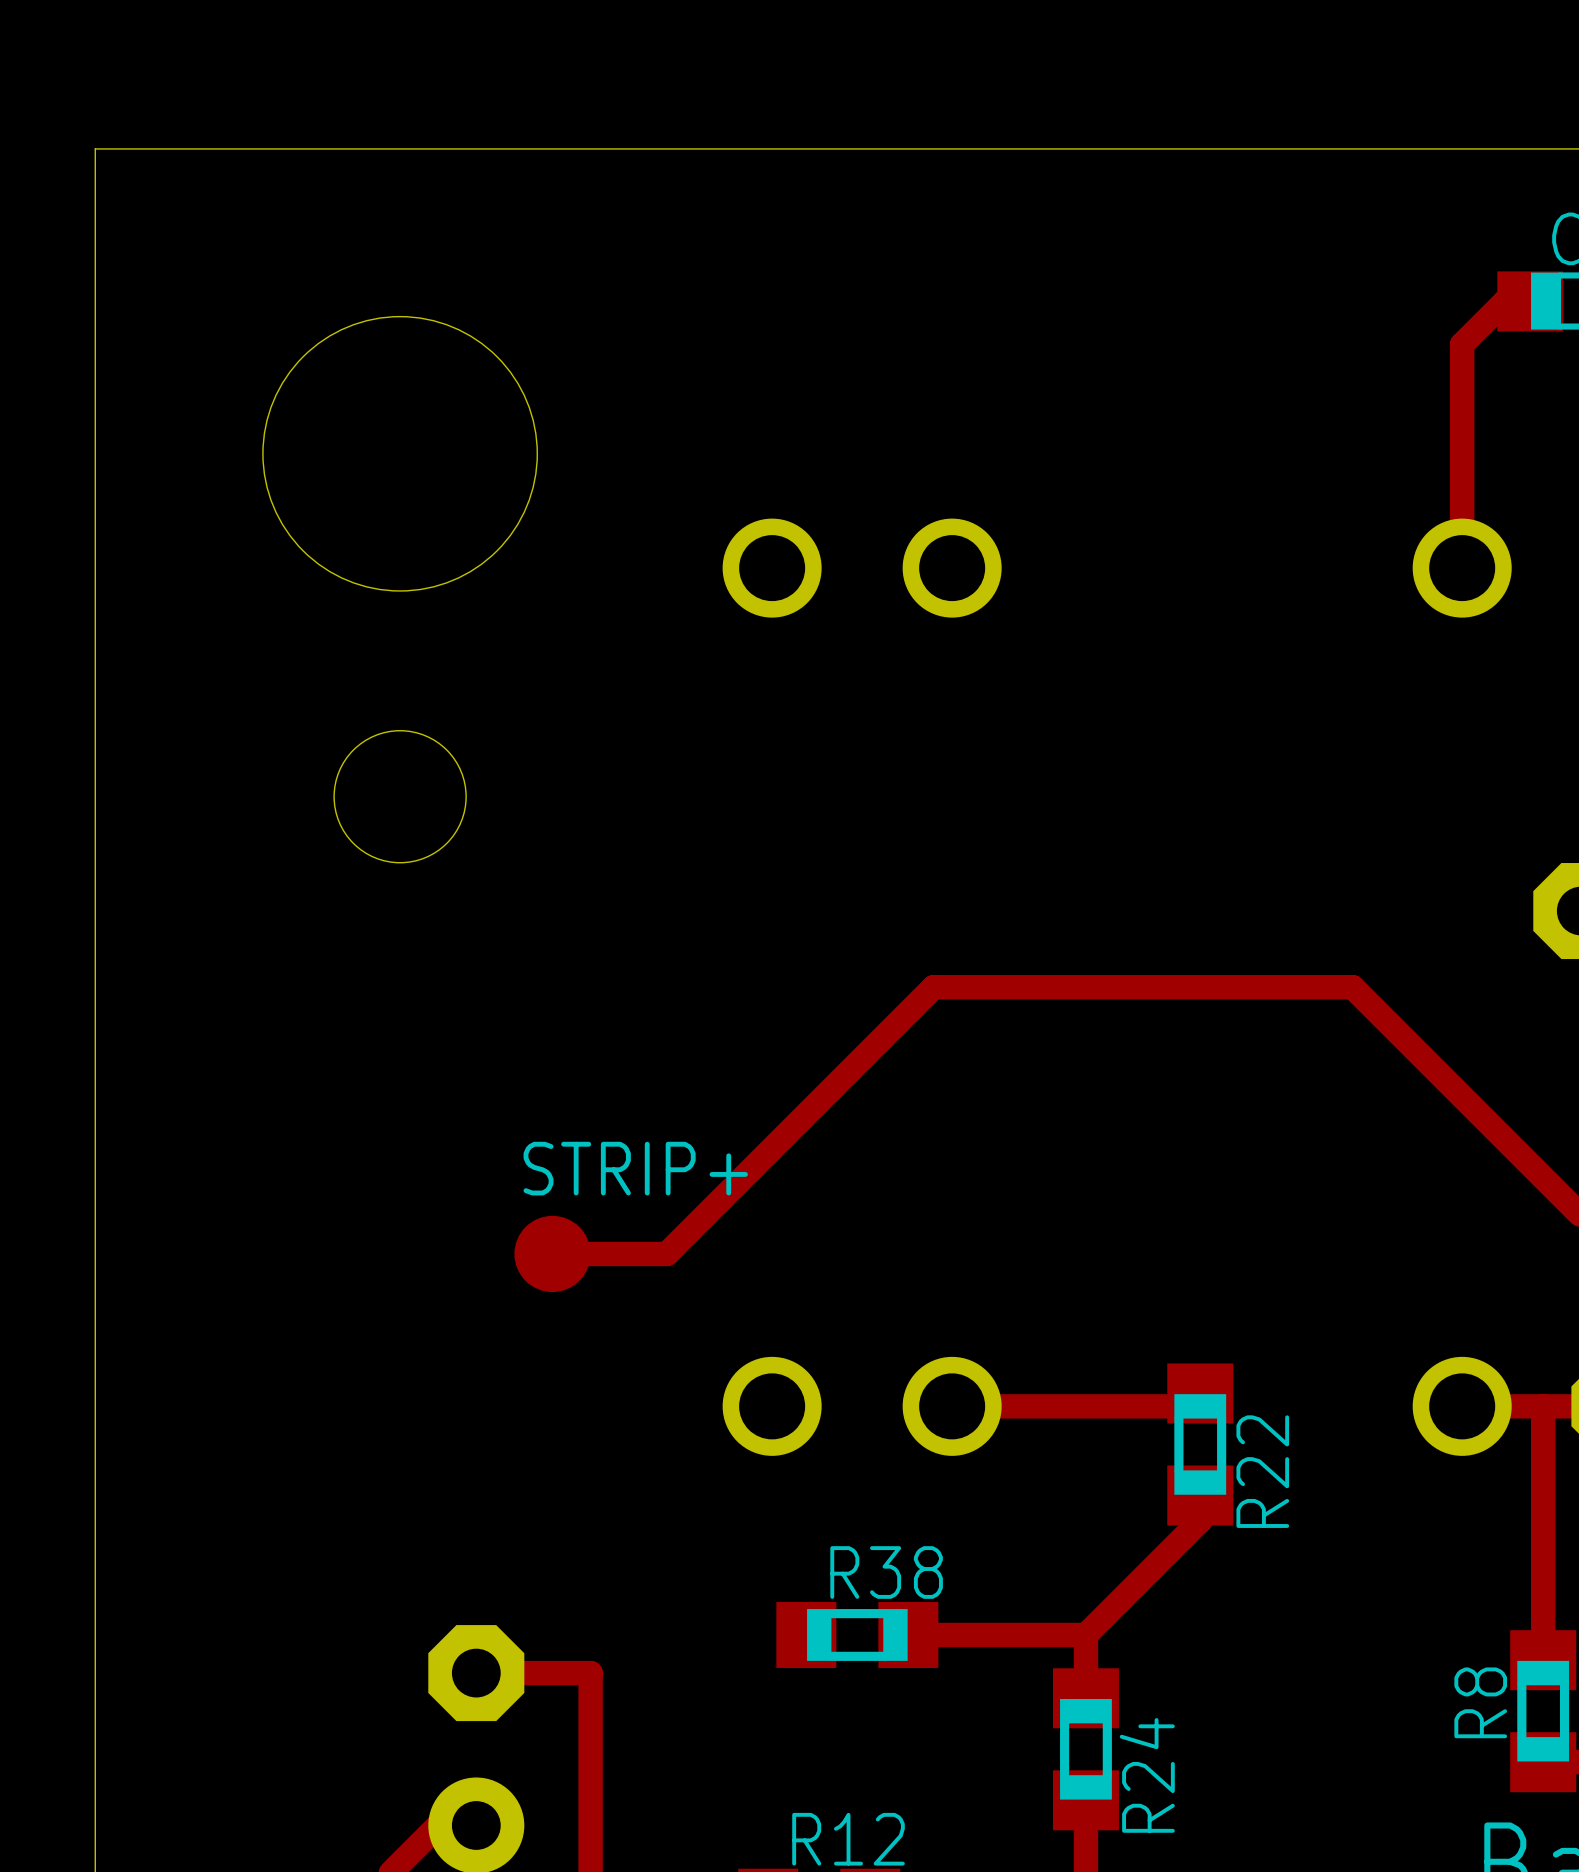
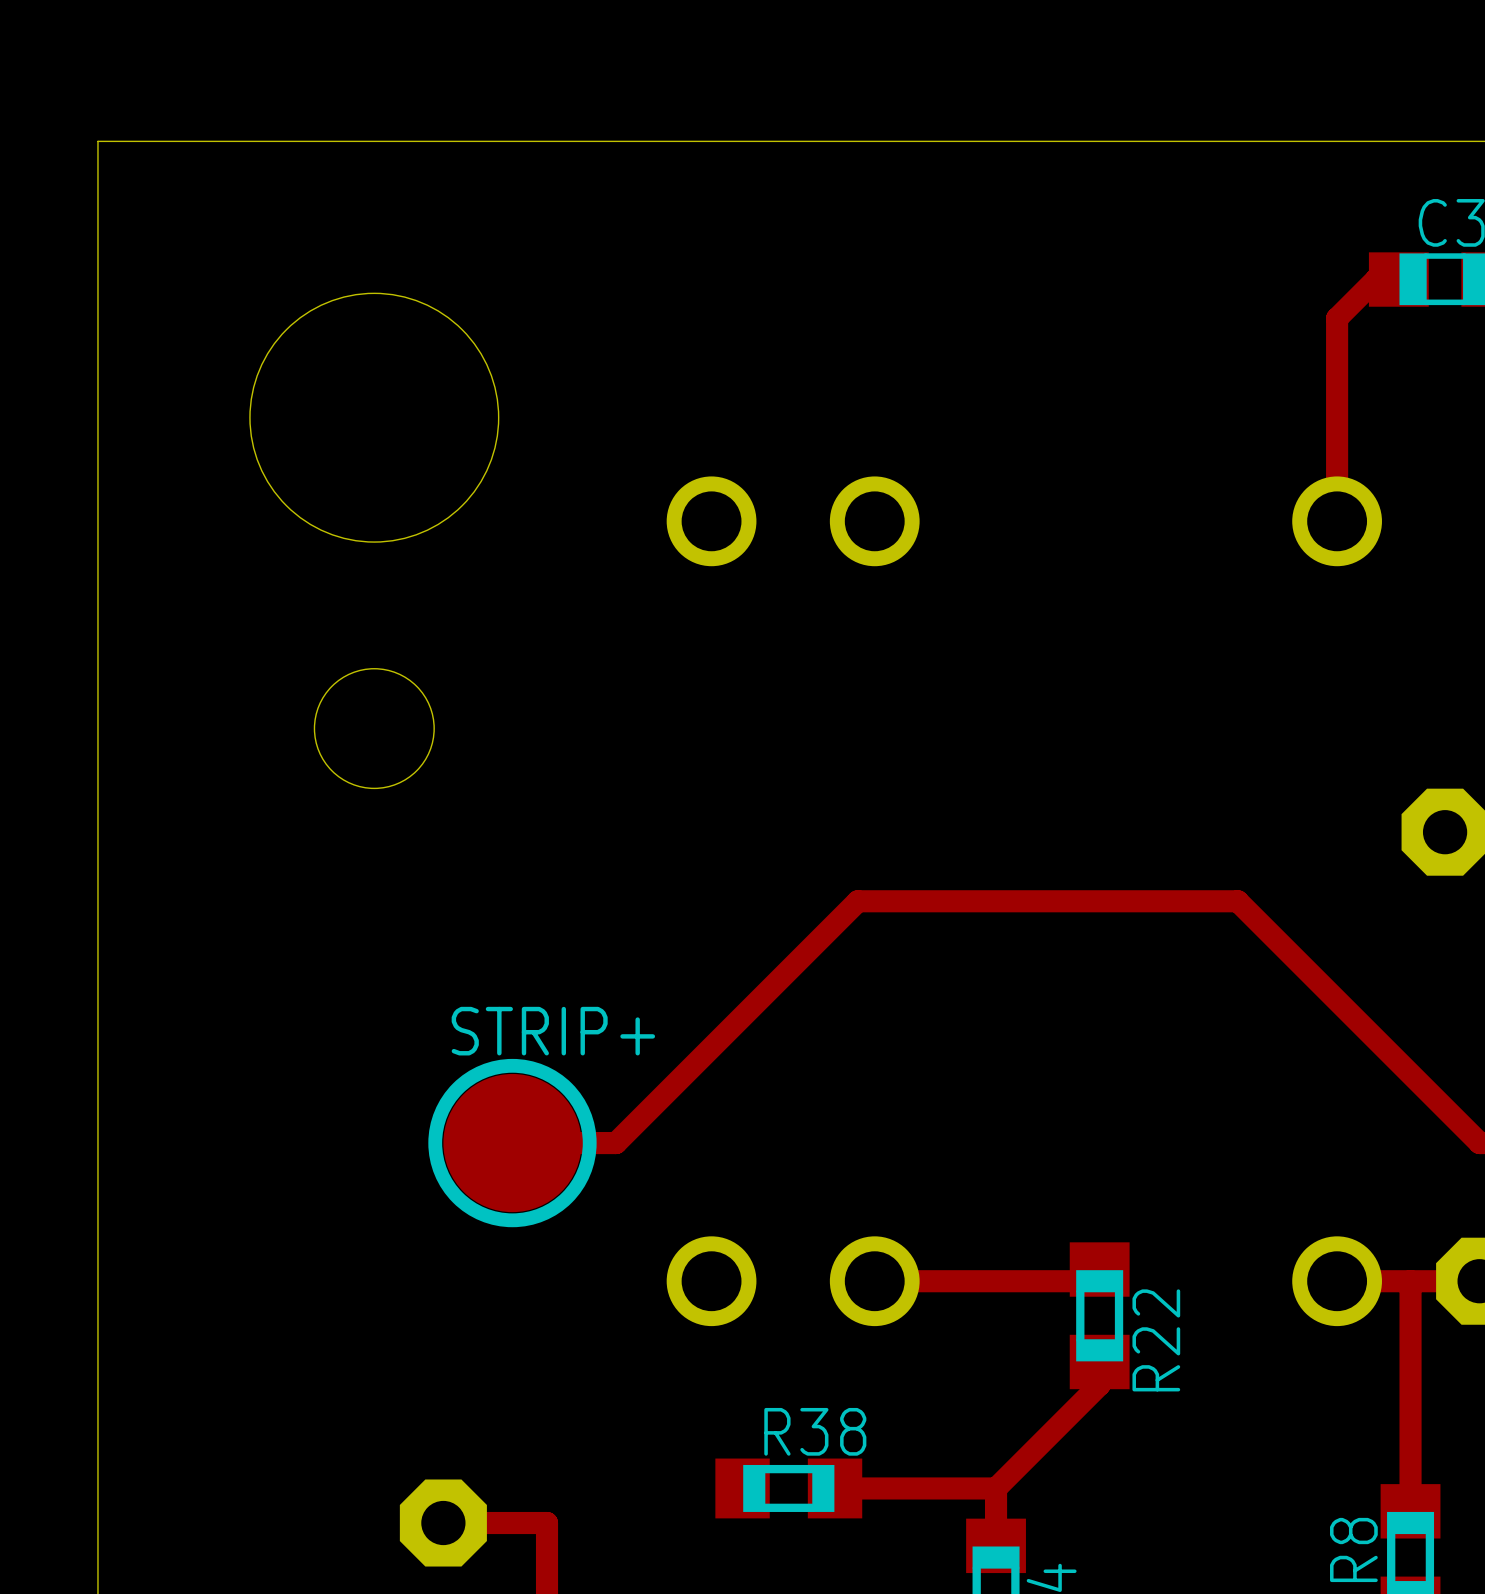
drawing: none -> [428, 1058, 597, 1228]
STRIP+ name position: STRIP+ (635, 1168) -> STRIP+ (553, 1031)
STRIP+ footprint: [514, 1215, 591, 1293] -> [443, 1073, 582, 1213]

